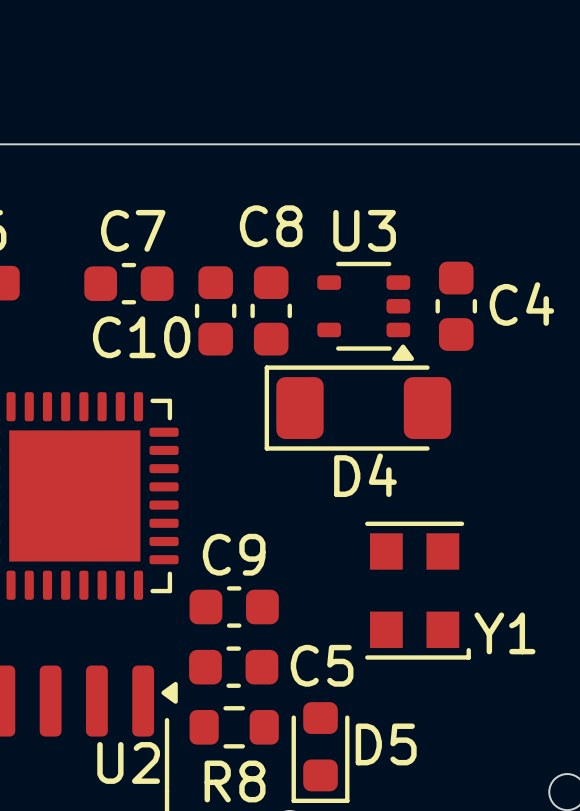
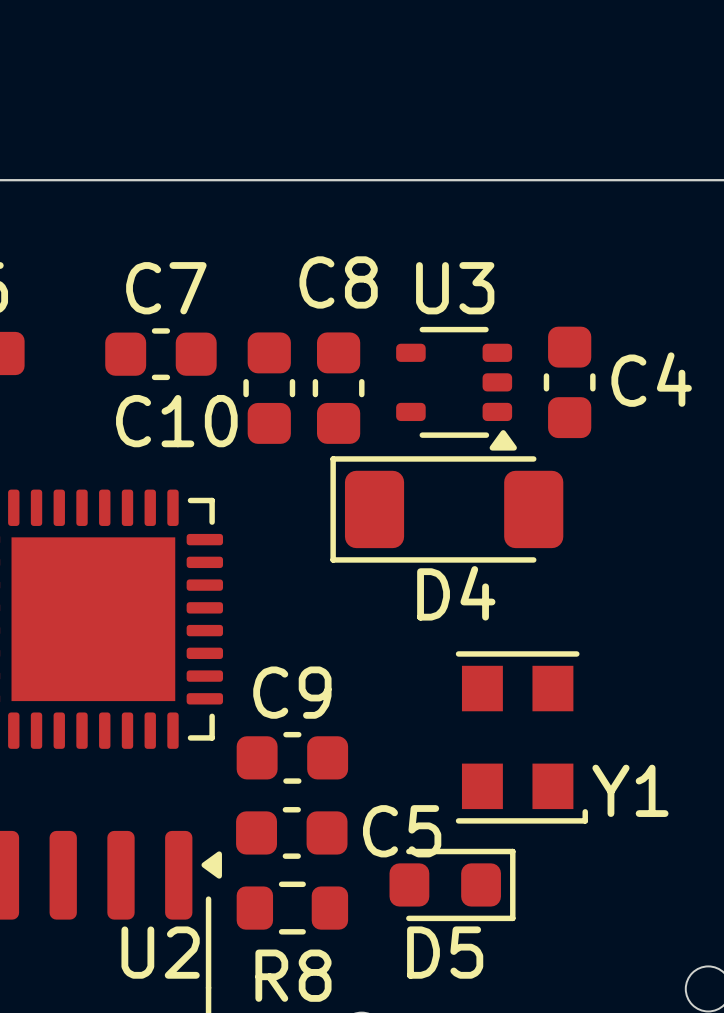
D5 name position: D5 (386, 744) -> D5 (445, 952)
D5 rotation: 0° (320, 752) -> 90° counterclockwise (452, 884)
D5 position: (320, 752) -> (452, 884)

